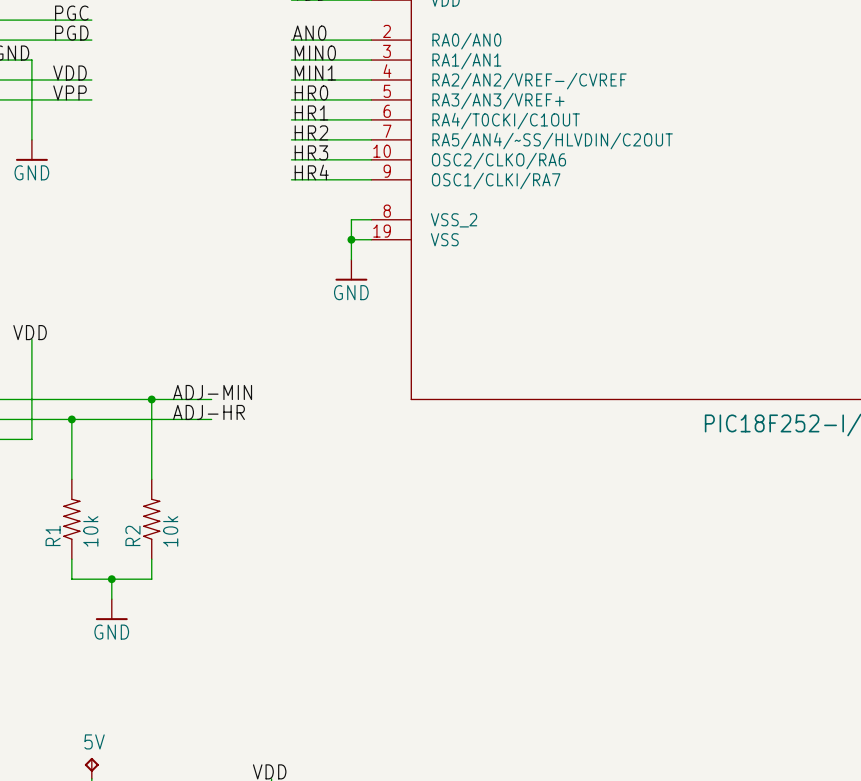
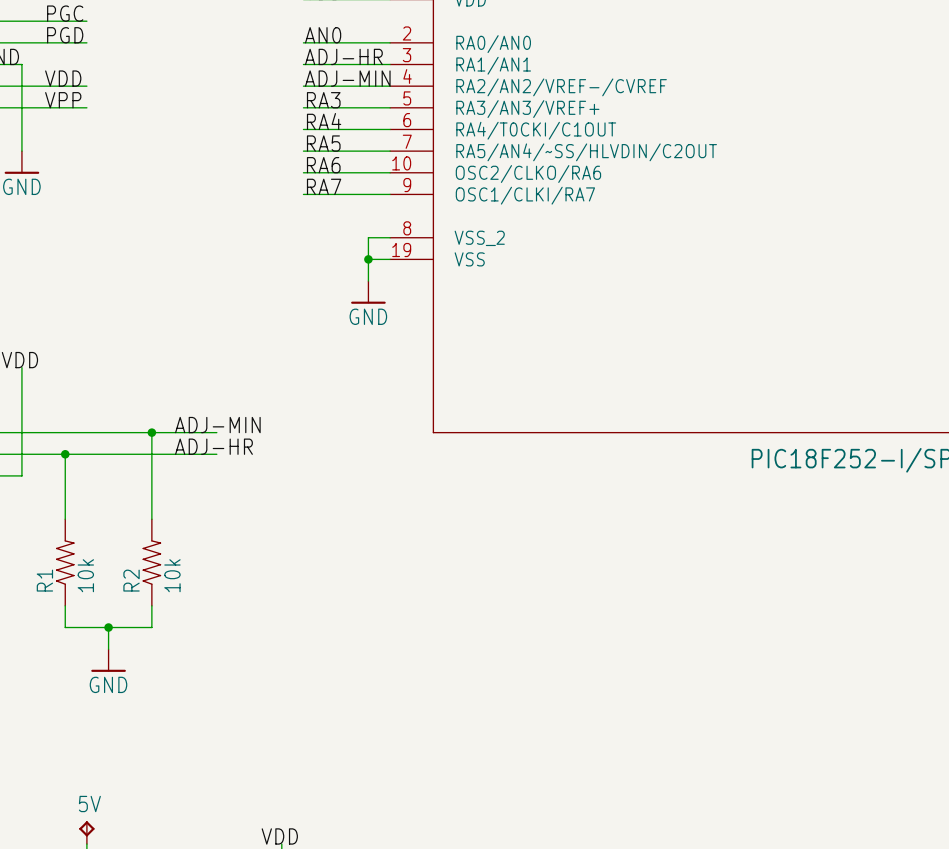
label: MIN0 (315, 53) -> ADJ-HR (343, 56)
label: MIN1 (315, 73) -> ADJ-MIN (347, 78)
label: HR0 (311, 92) -> RA3 (323, 100)
label: HR1 (311, 112) -> RA4 (324, 121)
label: HR2 (311, 132) -> RA5 (323, 143)
label: HR3 (311, 152) -> RA6 (323, 165)
label: HR4 (311, 172) -> RA7 (324, 186)

